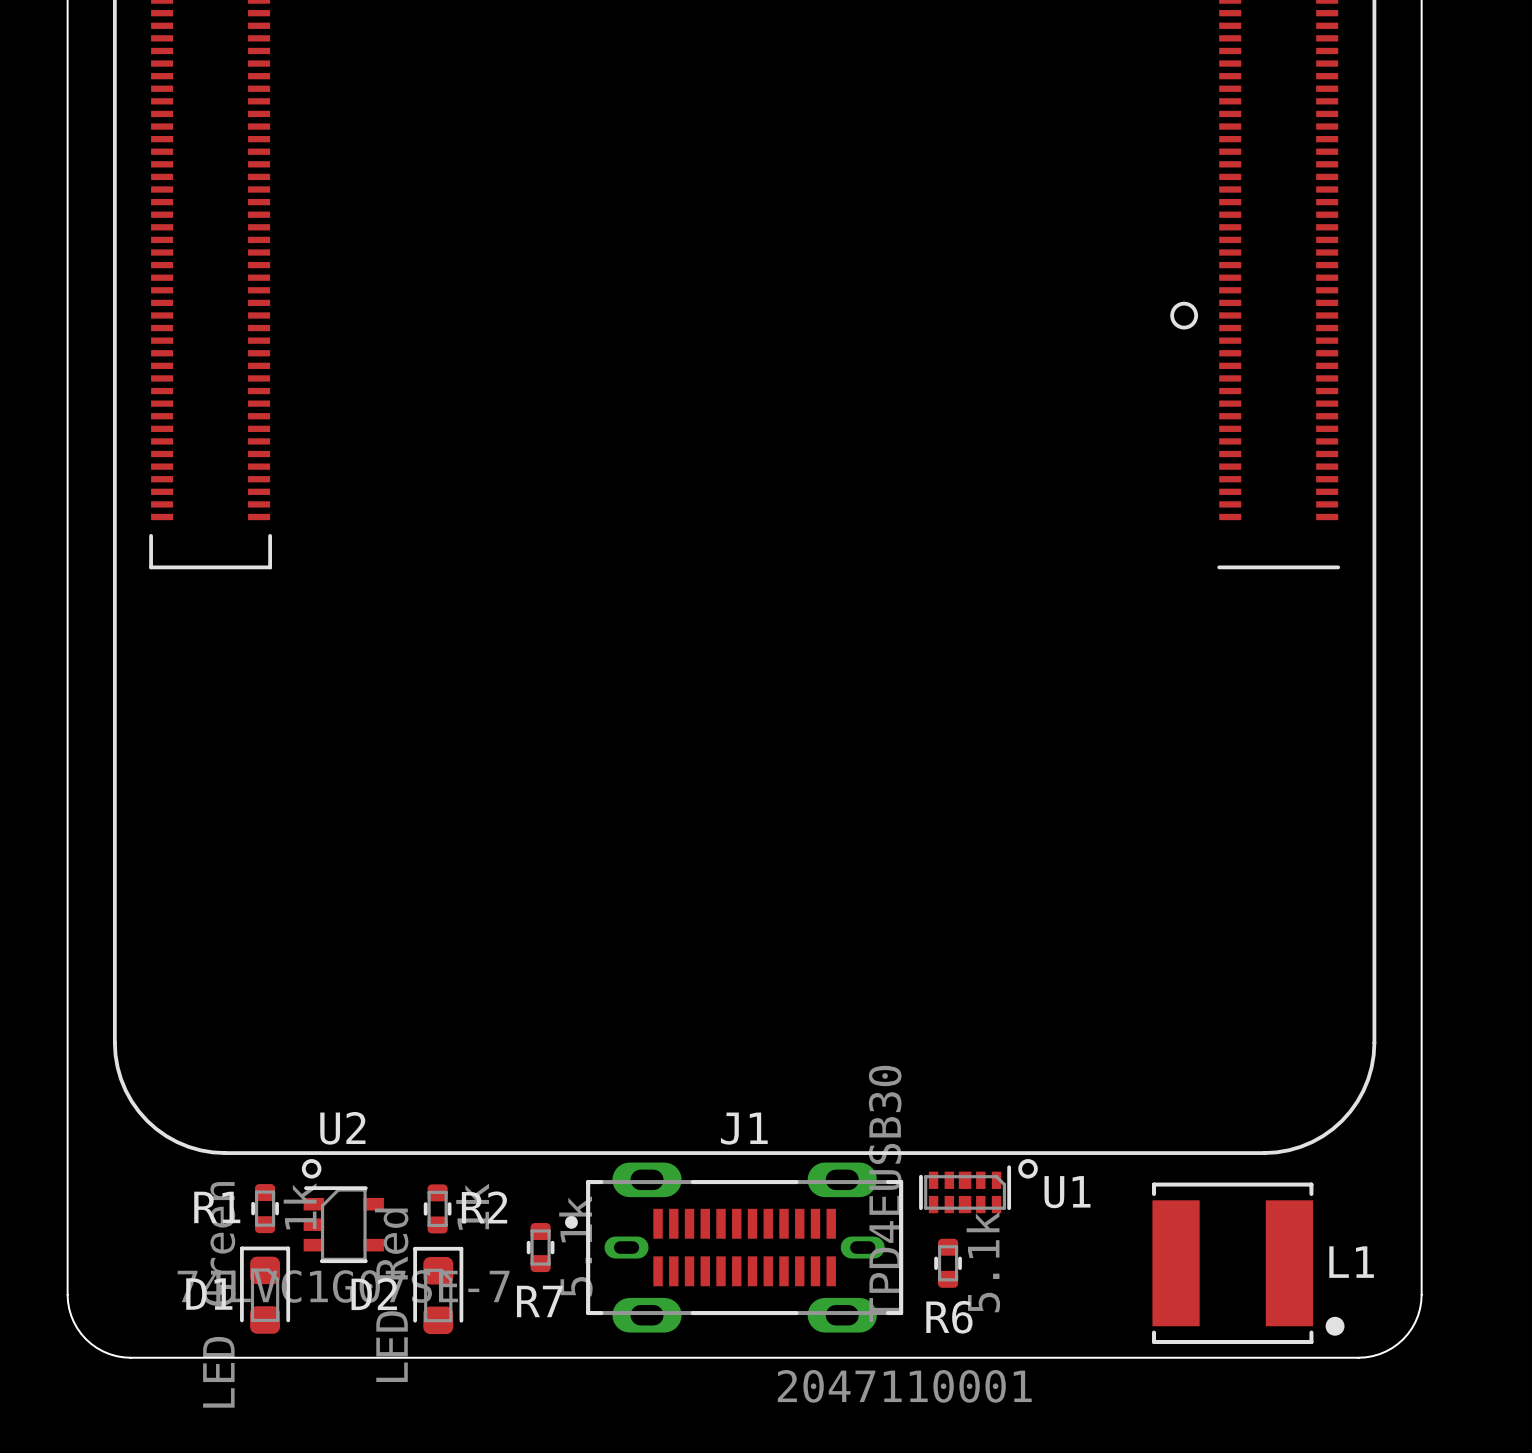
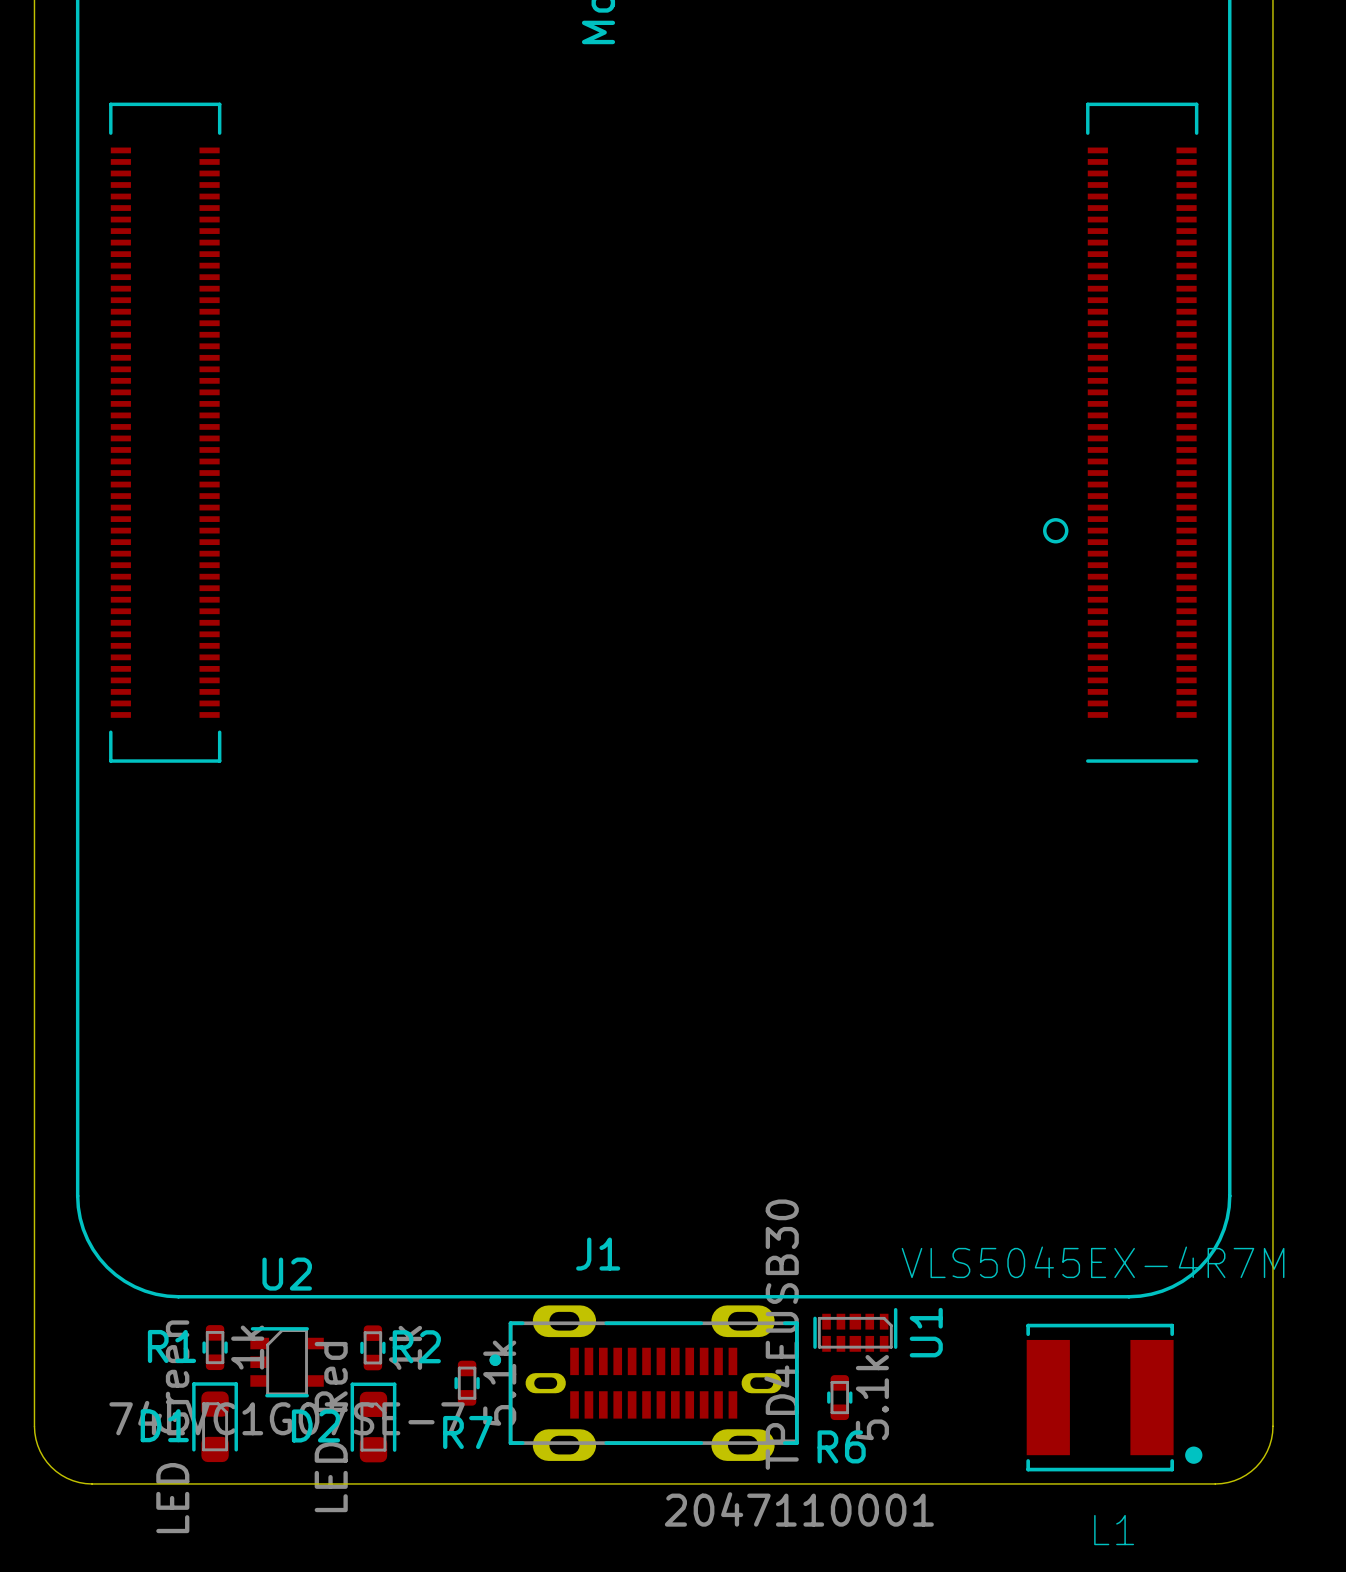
L1 value: none -> VLS5045EX-4R7M (1093, 1262)
J1 name position: J1 (744, 1128) -> J1 (598, 1254)
drawing: [301, 1159, 322, 1179] -> none
drawing: [1018, 1159, 1038, 1179] -> none
U1 name rotation: 0° (1067, 1192) -> 90° counterclockwise (926, 1332)
L1 name position: L1 (1351, 1262) -> L1 (1114, 1530)

